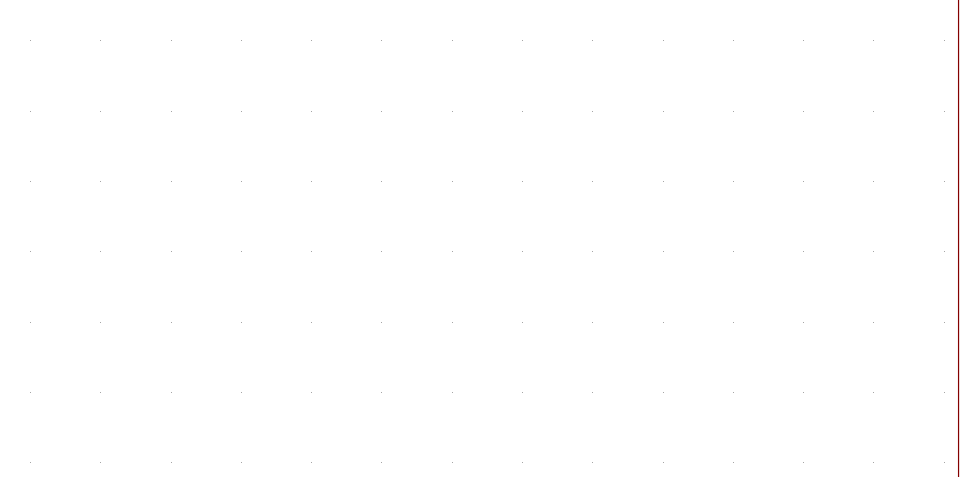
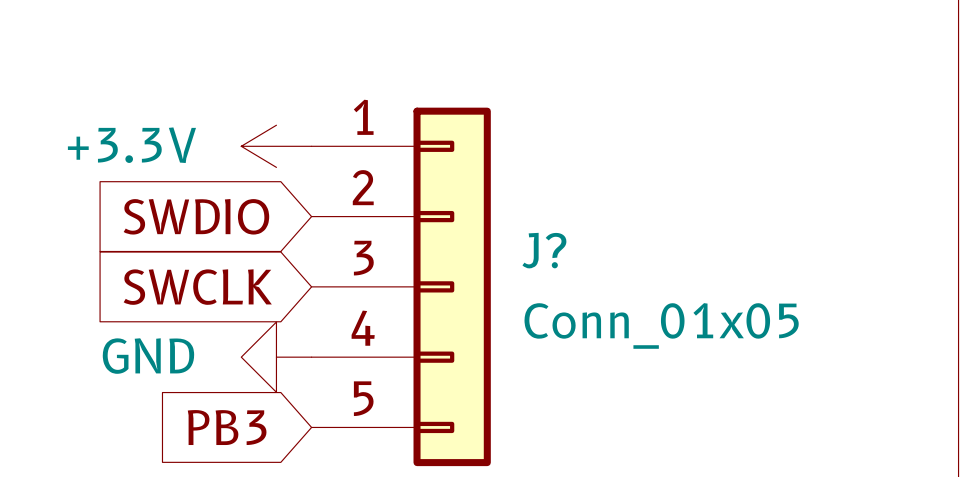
power symbol: none -> +3.3V (276, 146)
global label: none -> SWDIO (196, 216)
global label: none -> SWCLK (197, 287)
J?: none -> Conn_01x05 (401, 286)
power symbol: none -> GND (276, 357)
global label: none -> PB3 (227, 427)

